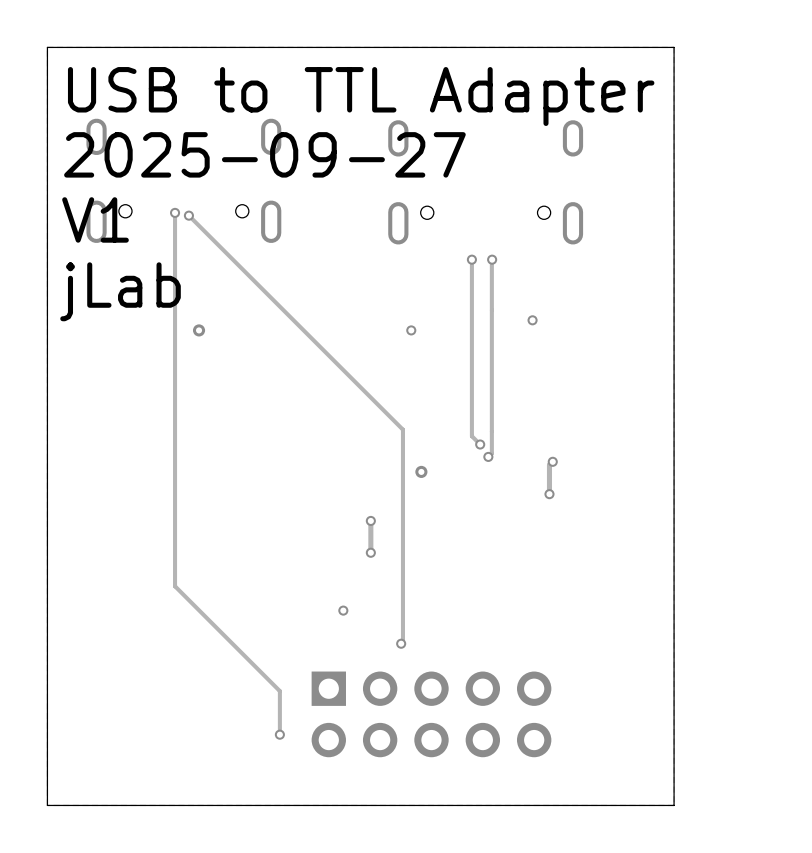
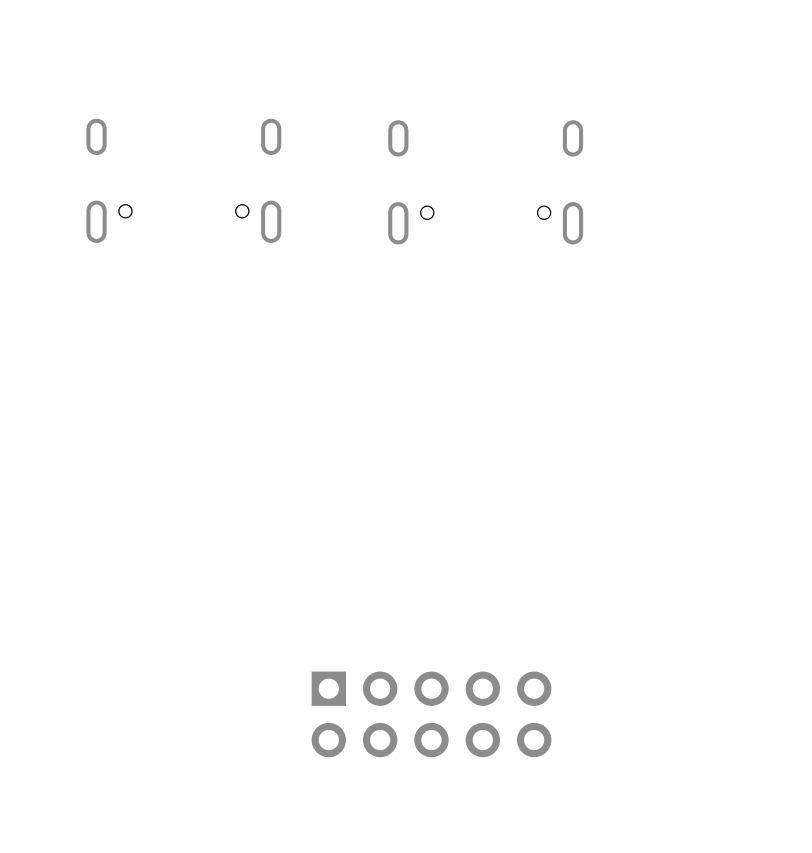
board edge: (674, 47) (47, 47) (47, 805) (674, 805) (674, 47) -> none
text: USB to TTL Adapter (361, 96) -> none
text: 2025-09-27 (264, 154) -> none
track: (175, 212) (175, 586) (279, 691) (279, 734) -> none
via: (175, 212) -> none
track: (188, 215) (402, 429) (402, 641) (401, 643) -> none
via: (188, 215) -> none
text: V1 (95, 219) -> none
track: (471, 259) (471, 436) (480, 444) -> none
via: (471, 259) -> none
track: (491, 259) (491, 453) (488, 456) -> none
via: (492, 259) -> none
text: jLab (120, 291) -> none
via: (532, 320) -> none
via: (199, 330) -> none
via: (411, 330) -> none
via: (480, 444) -> none
via: (488, 456) -> none
track: (552, 461) (549, 465) (549, 494) -> none
via: (552, 461) -> none
via: (421, 471) -> none
via: (549, 494) -> none
track: (370, 520) (370, 552) -> none
via: (370, 520) -> none
via: (370, 552) -> none
via: (343, 610) -> none
via: (401, 643) -> none
via: (279, 734) -> none

